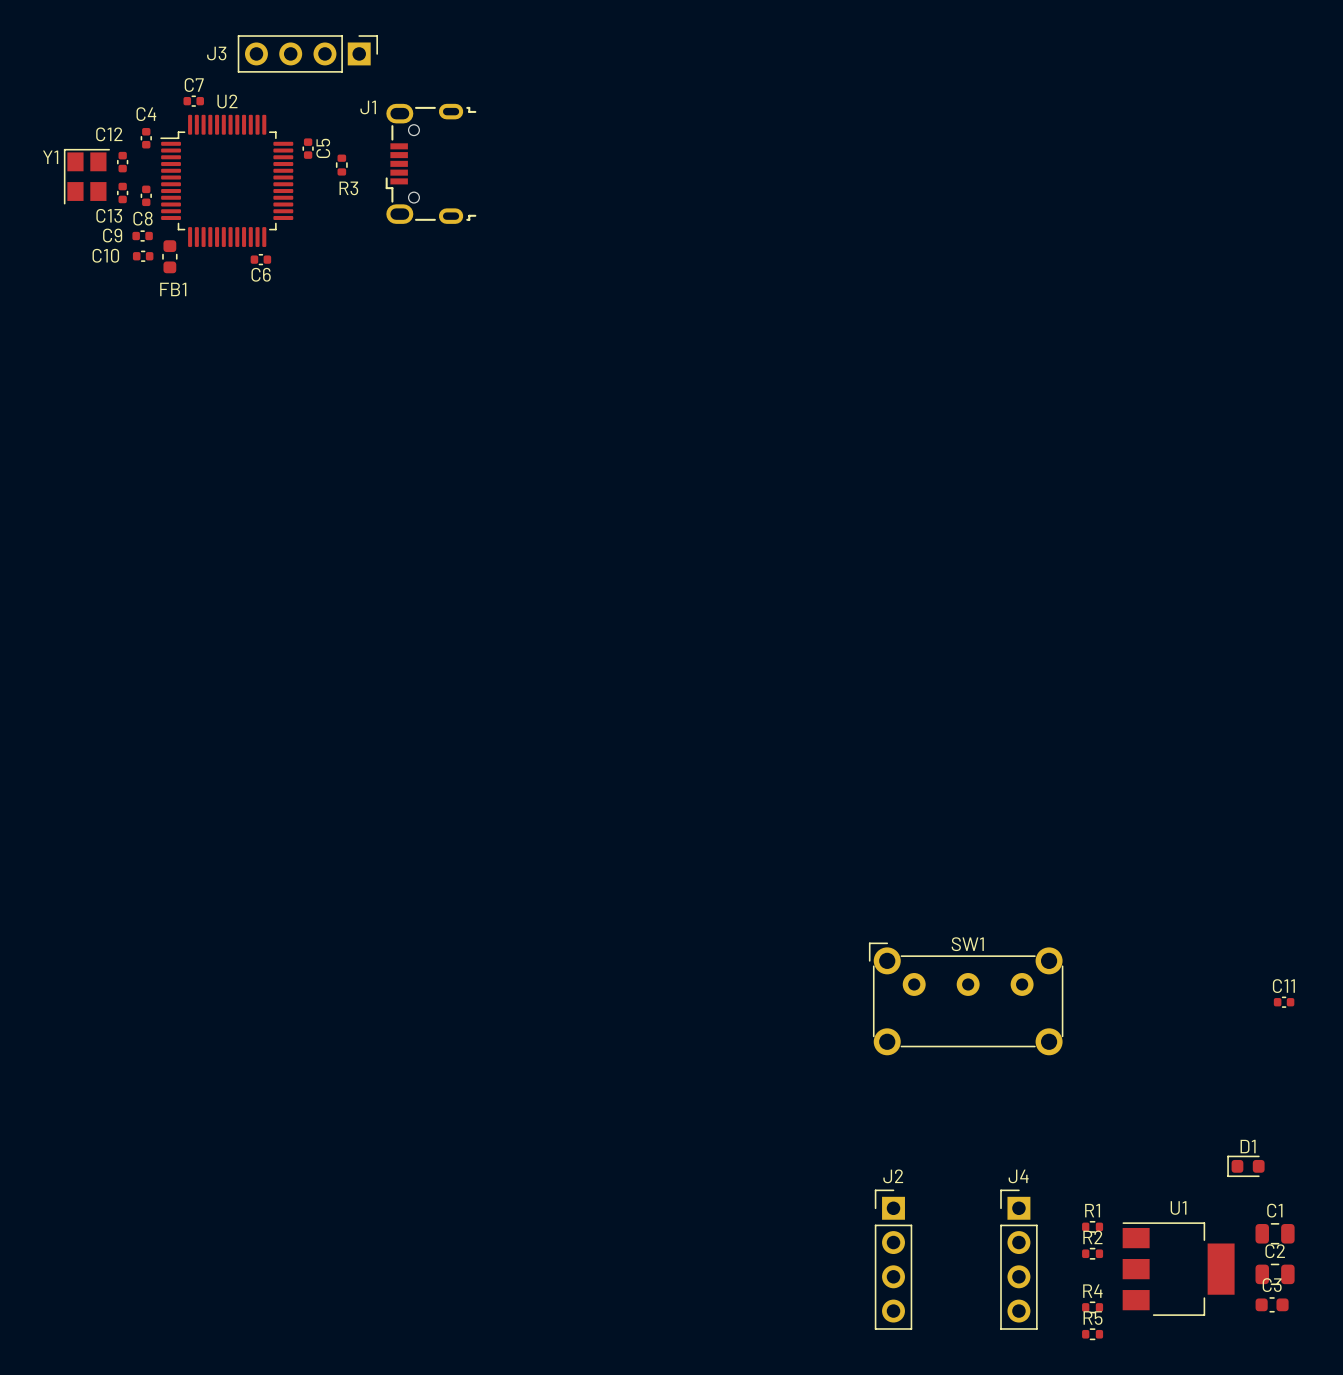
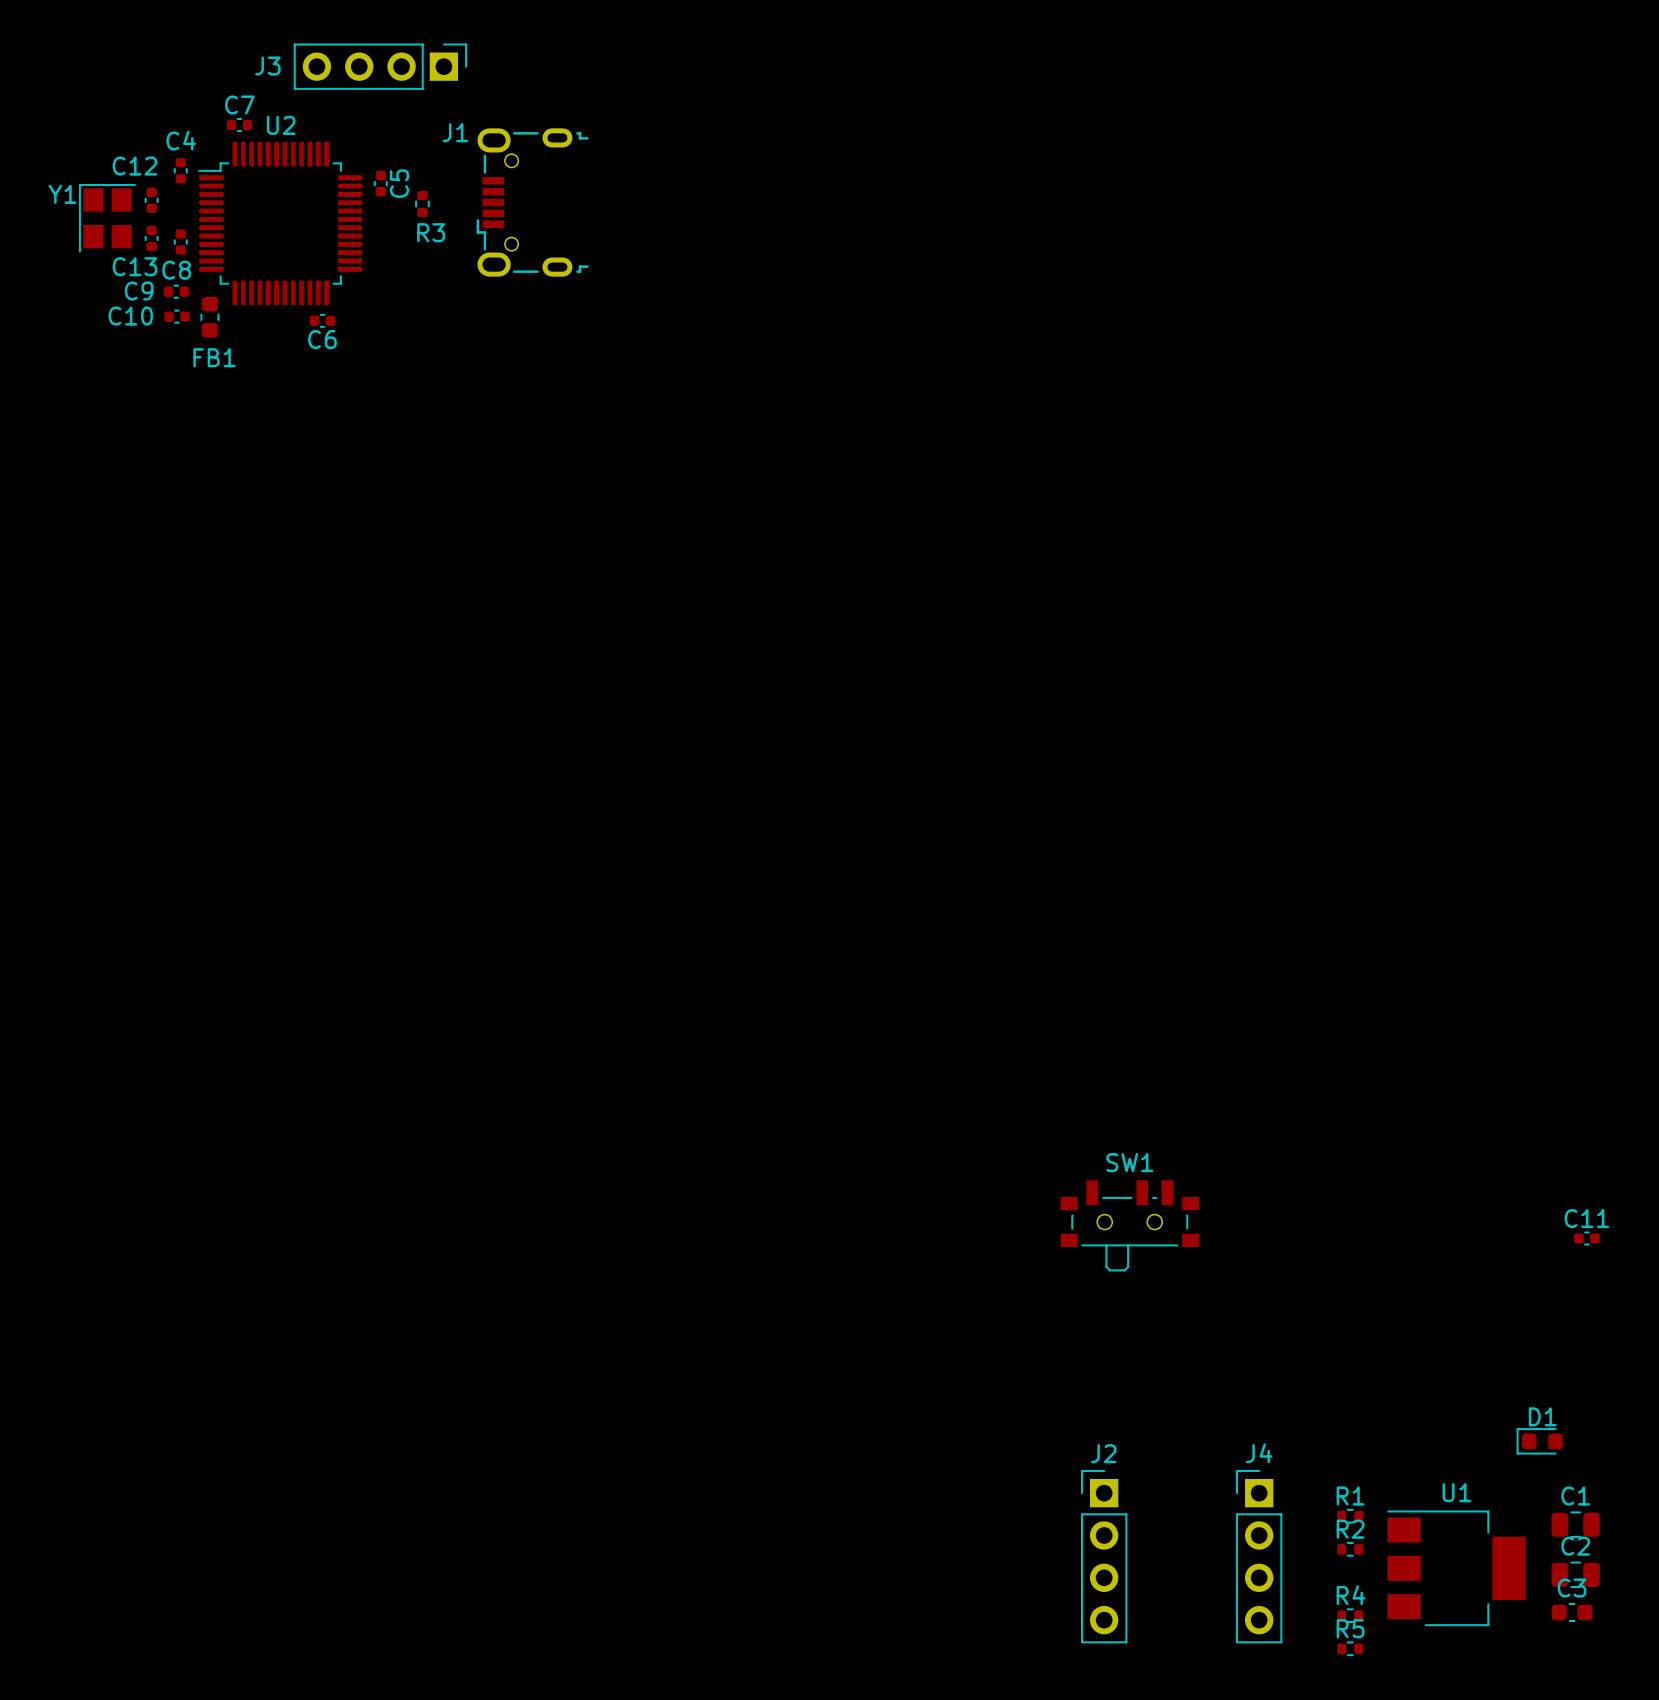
SW1 footprint: [868, 942, 1064, 1056] -> [1060, 1180, 1199, 1272]

